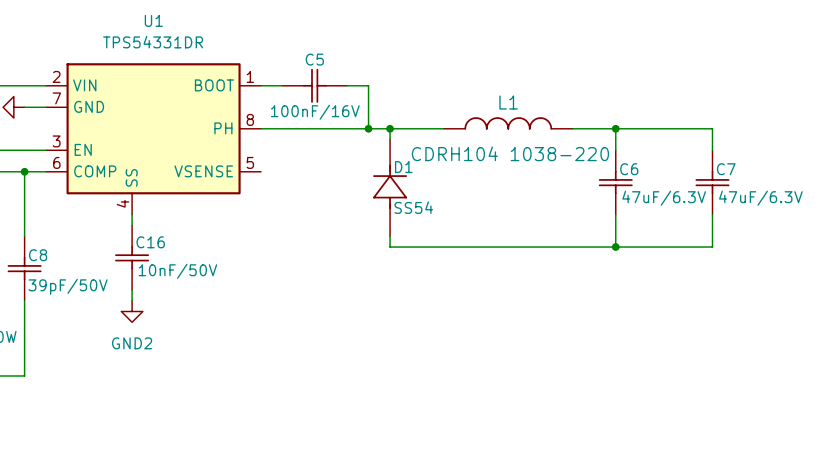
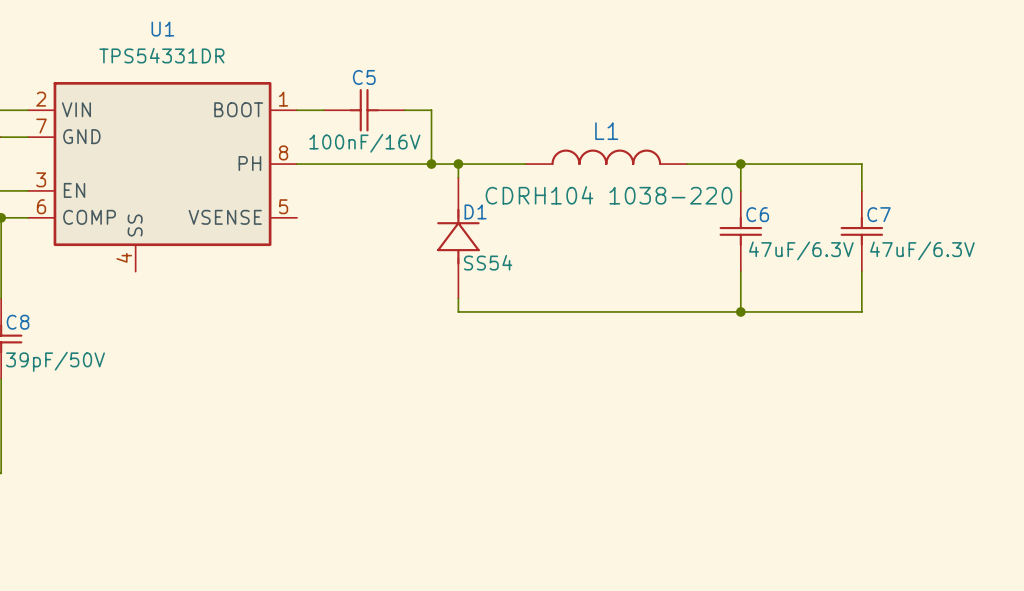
wire: (132, 214) (132, 225) -> none
C16: 10nF/50V (132, 257) -> none
wire: (132, 290) (132, 300) -> none
power symbol: GND2 (132, 311) -> none

